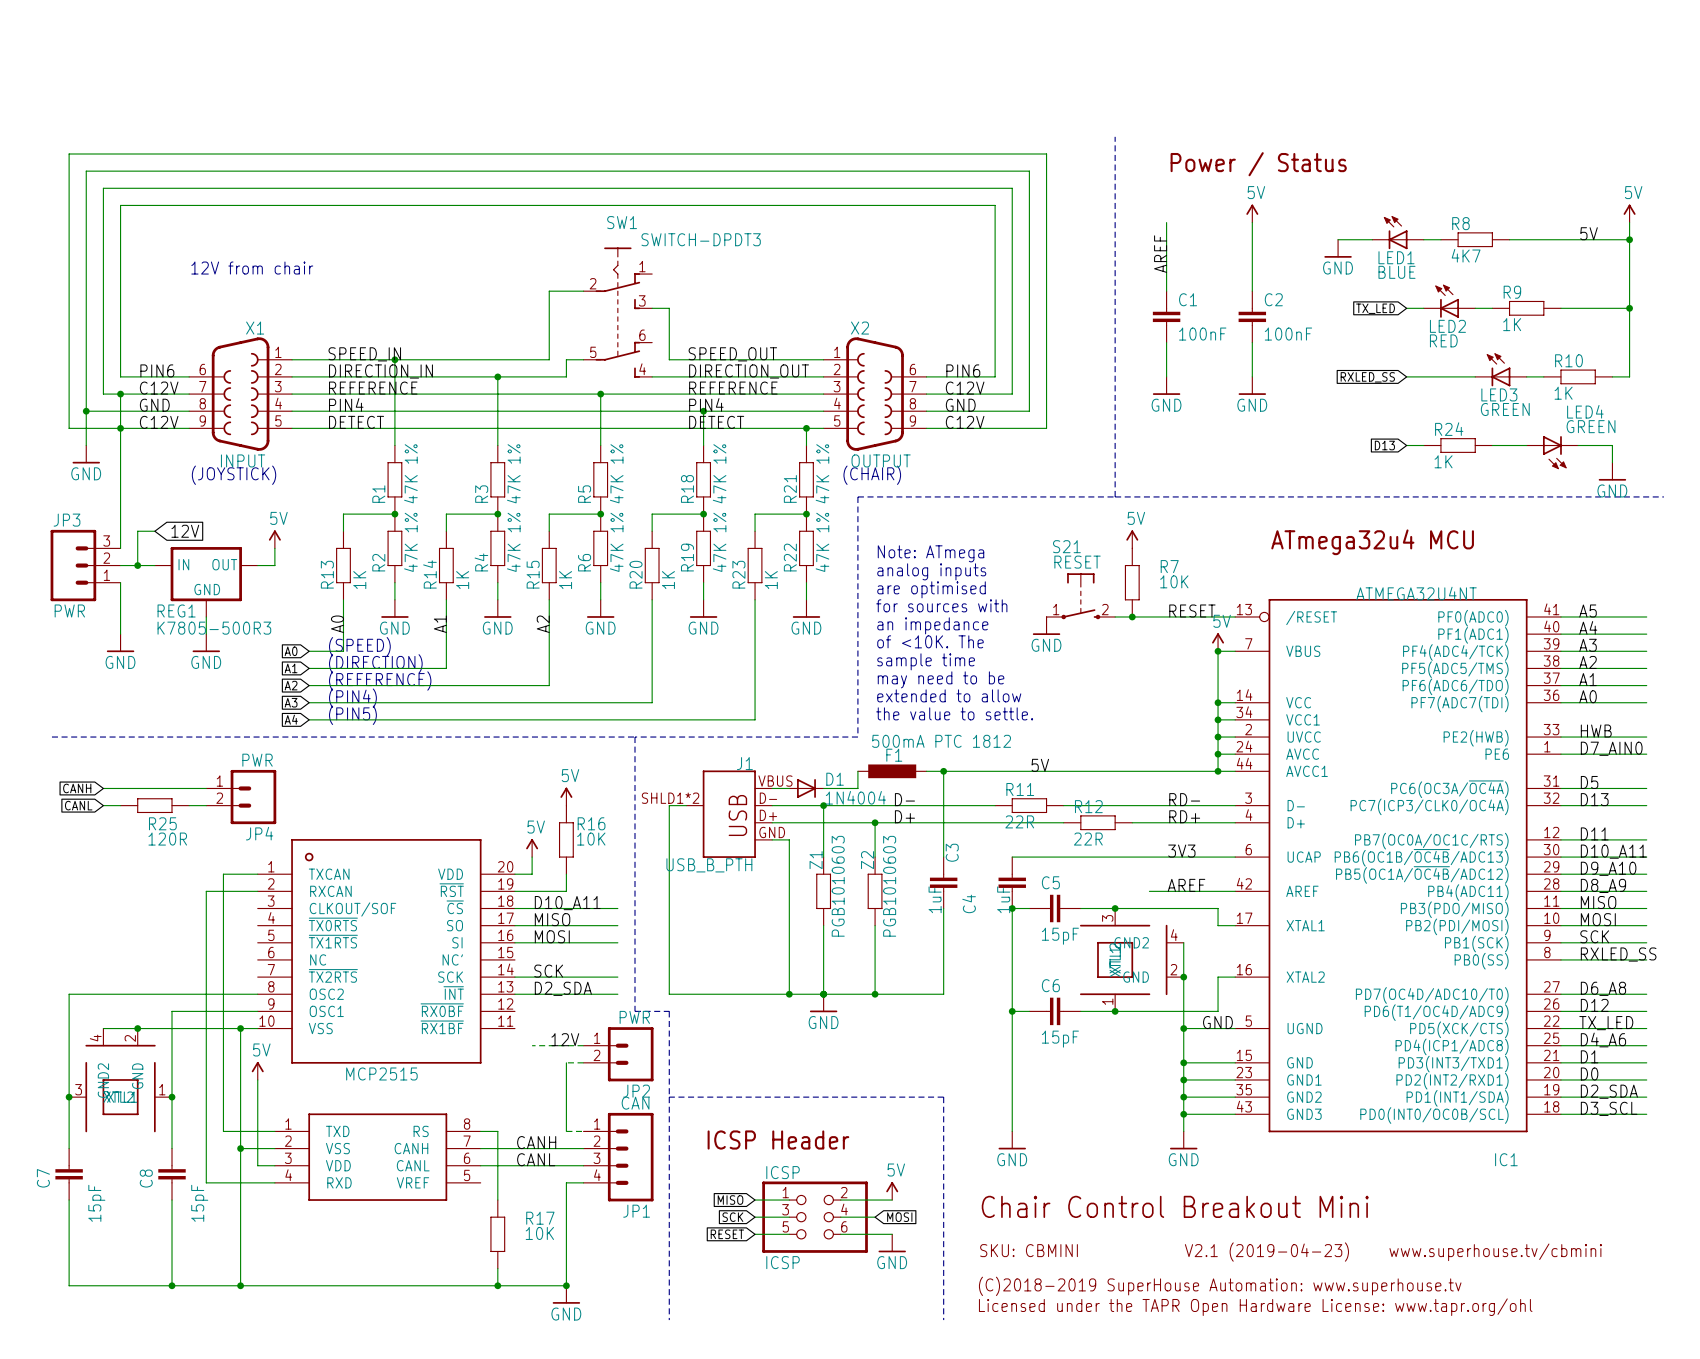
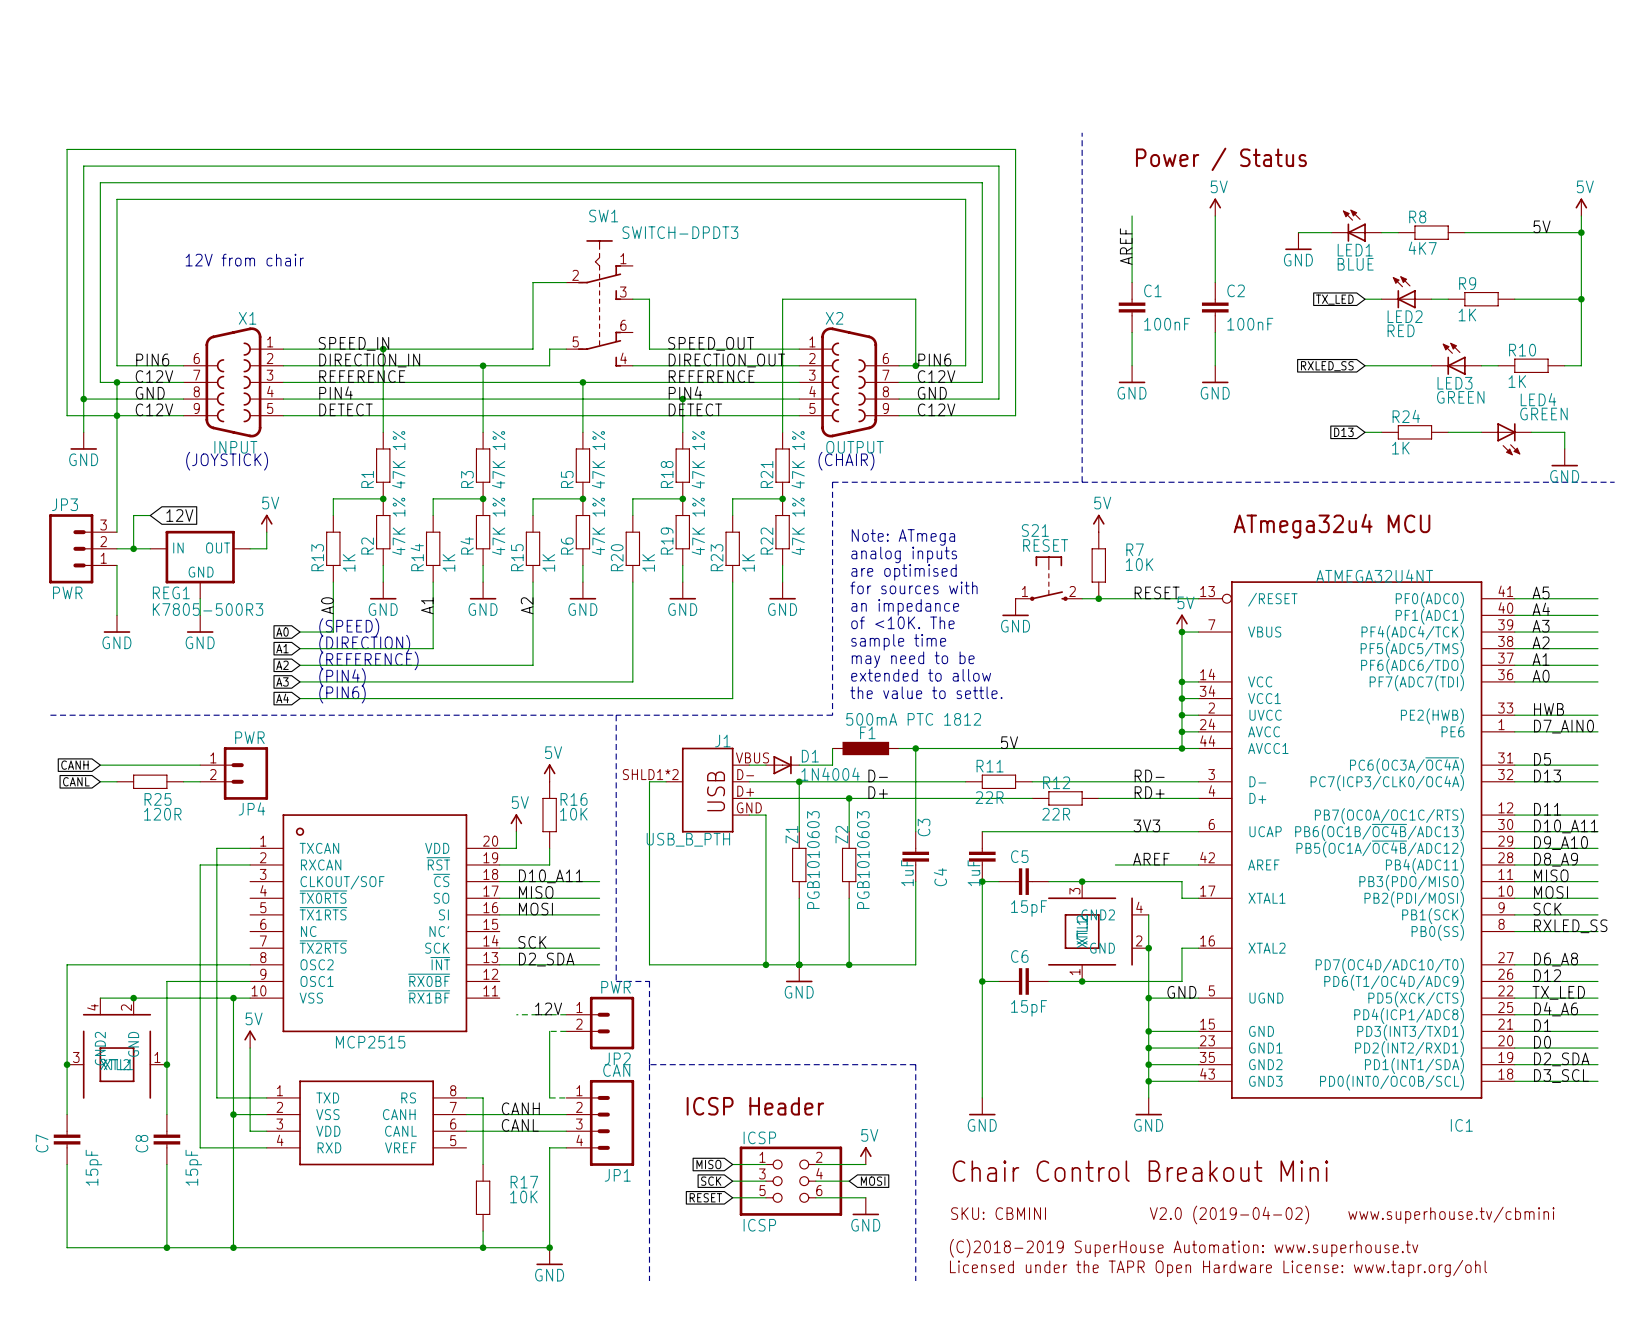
wire: none -> (915, 365) (915, 299) (782, 299) (782, 415)
junction: none -> (915, 365)
junction: (806, 428) -> none
text: (PIN5) (352, 715) -> (PIN6) (342, 694)
text: V2.1 (2019-04-23) (1266, 1252) -> V2.0 (2019-04-02) (1229, 1214)

